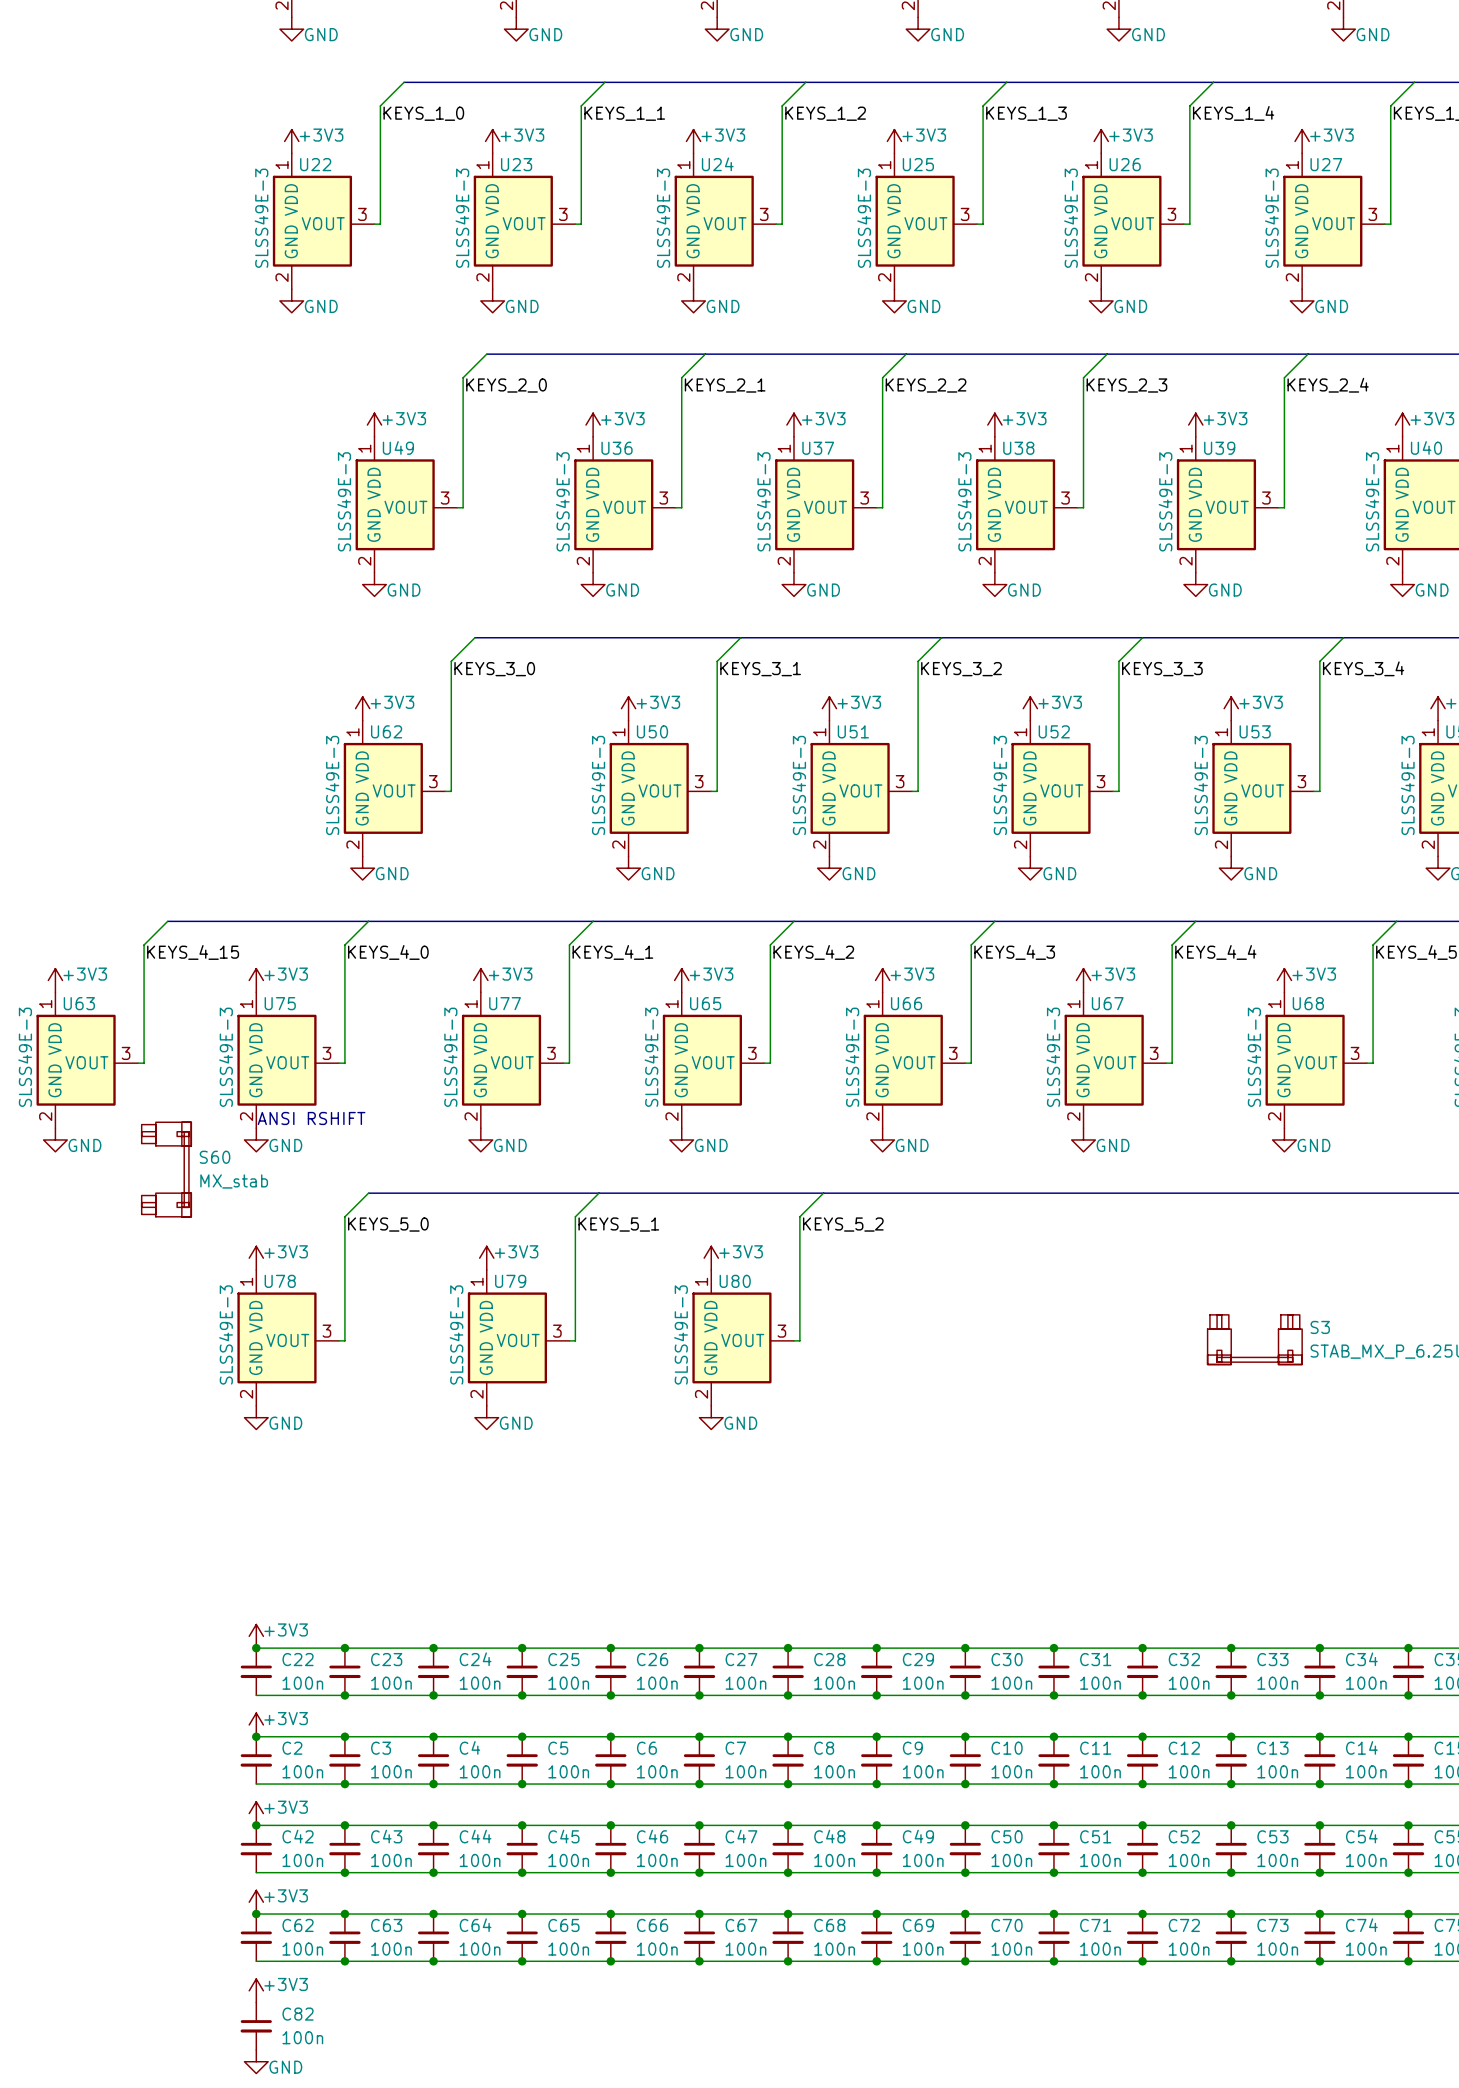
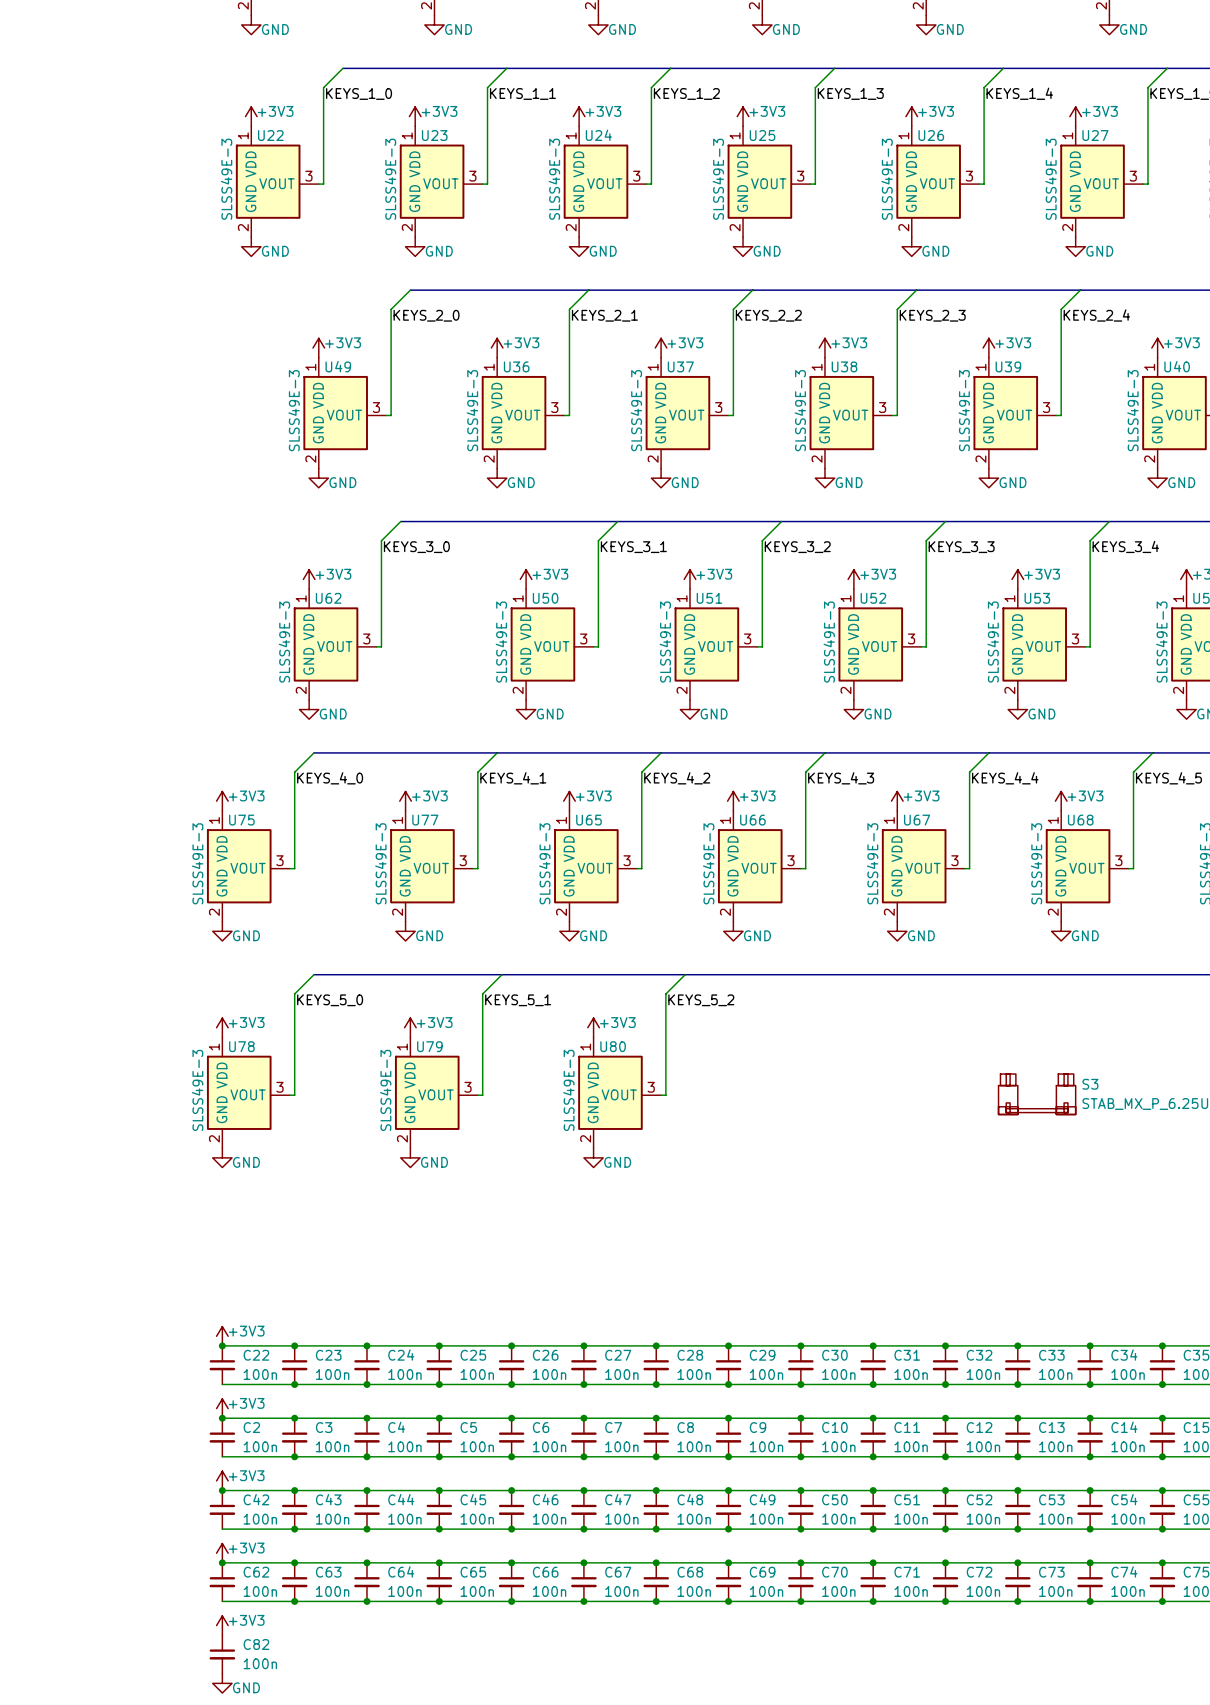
wire: (167, 921) (144, 945) (144, 1063) (138, 1063) -> none
bus: (167, 921) (368, 921) -> none
label: KEYS_4_15 (193, 952) -> none
power symbol: +3V3 (55, 980) -> none
U63: SLSS49E-3 (87, 1060) -> none
text: ANSI RSHIFT (311, 1118) -> none
power symbol: GND (55, 1139) -> none
S60: MX_stab (166, 1169) -> none

